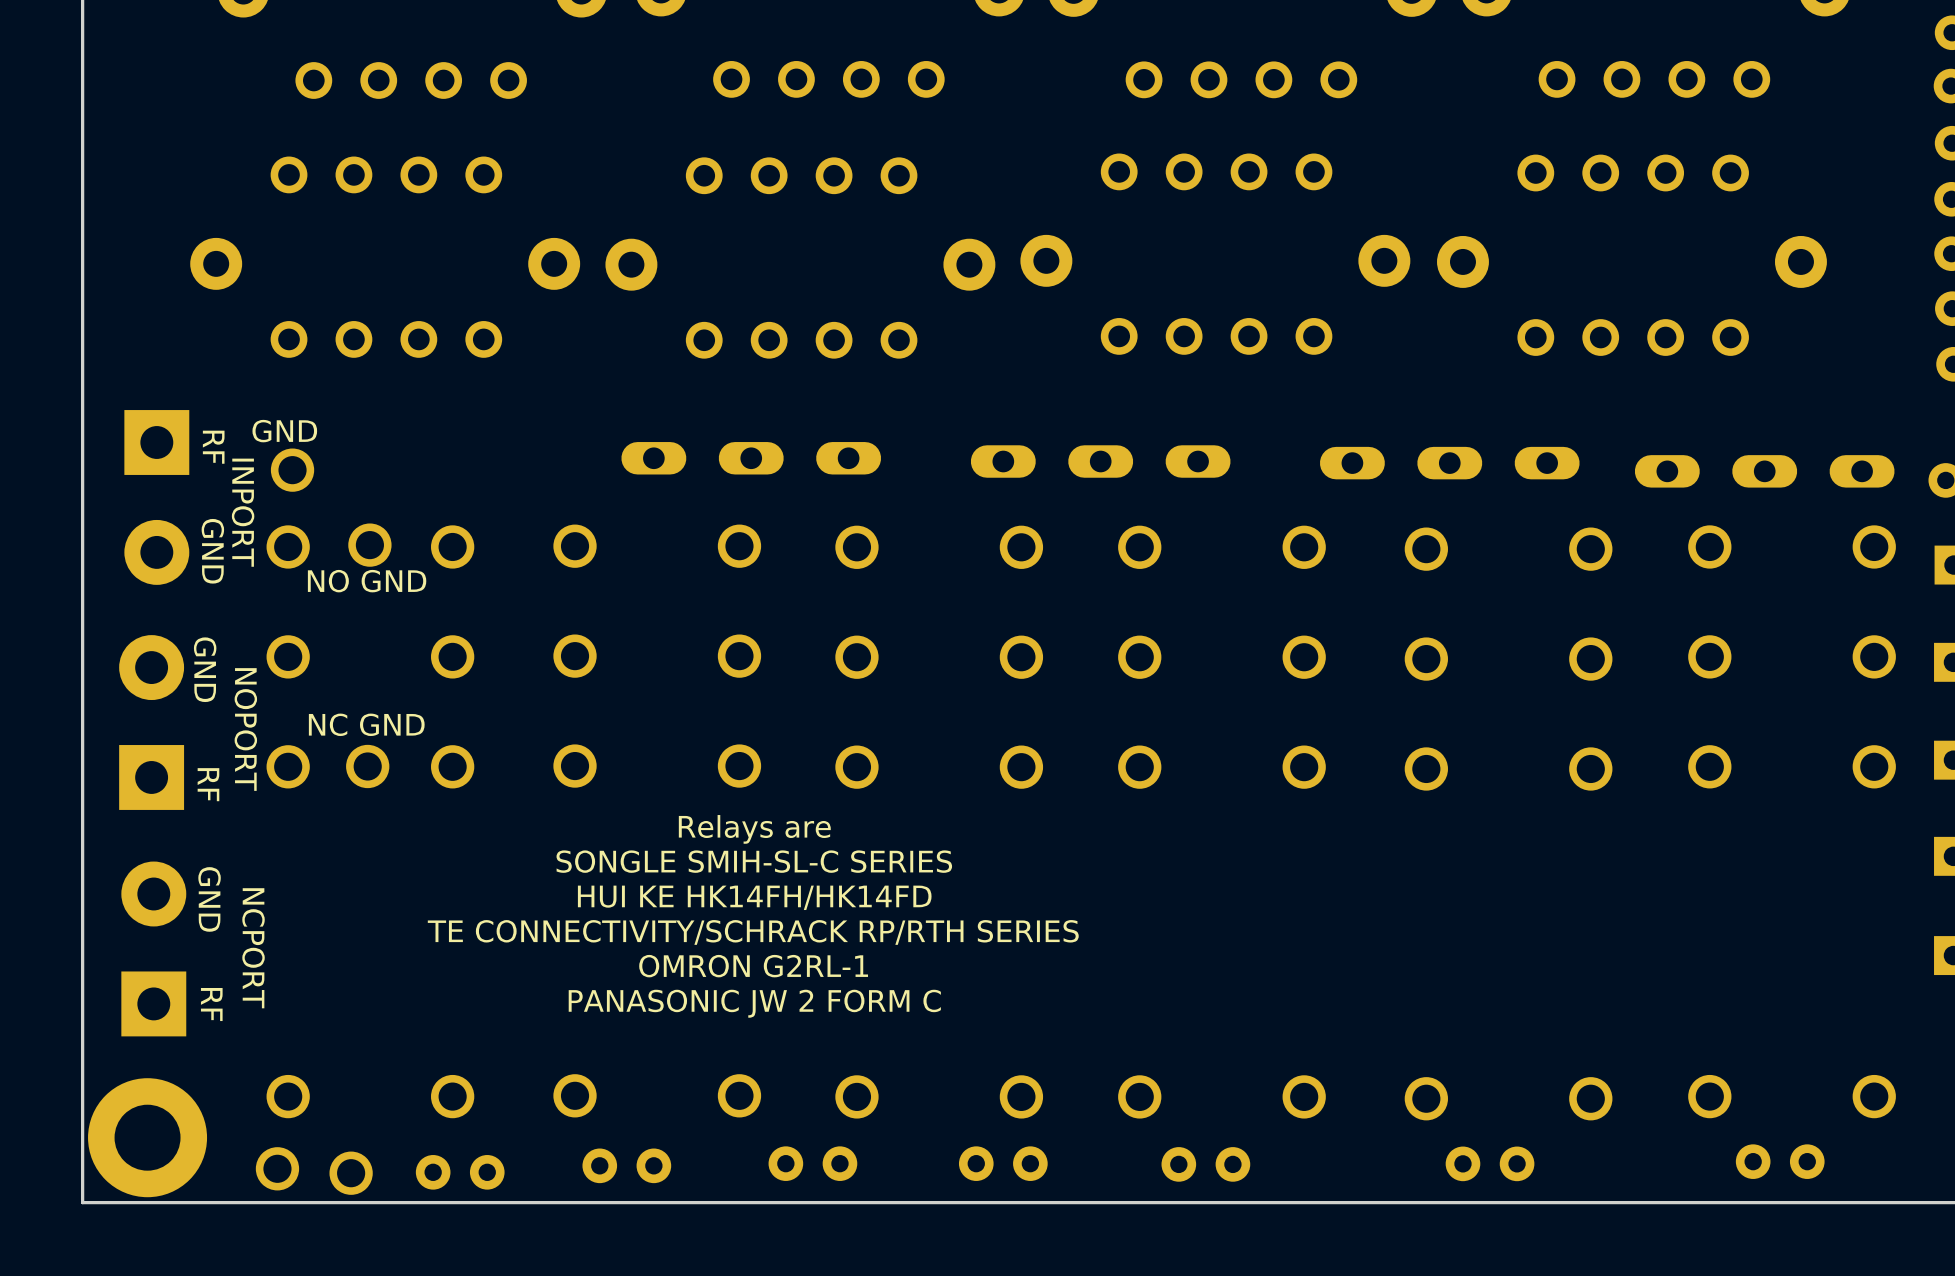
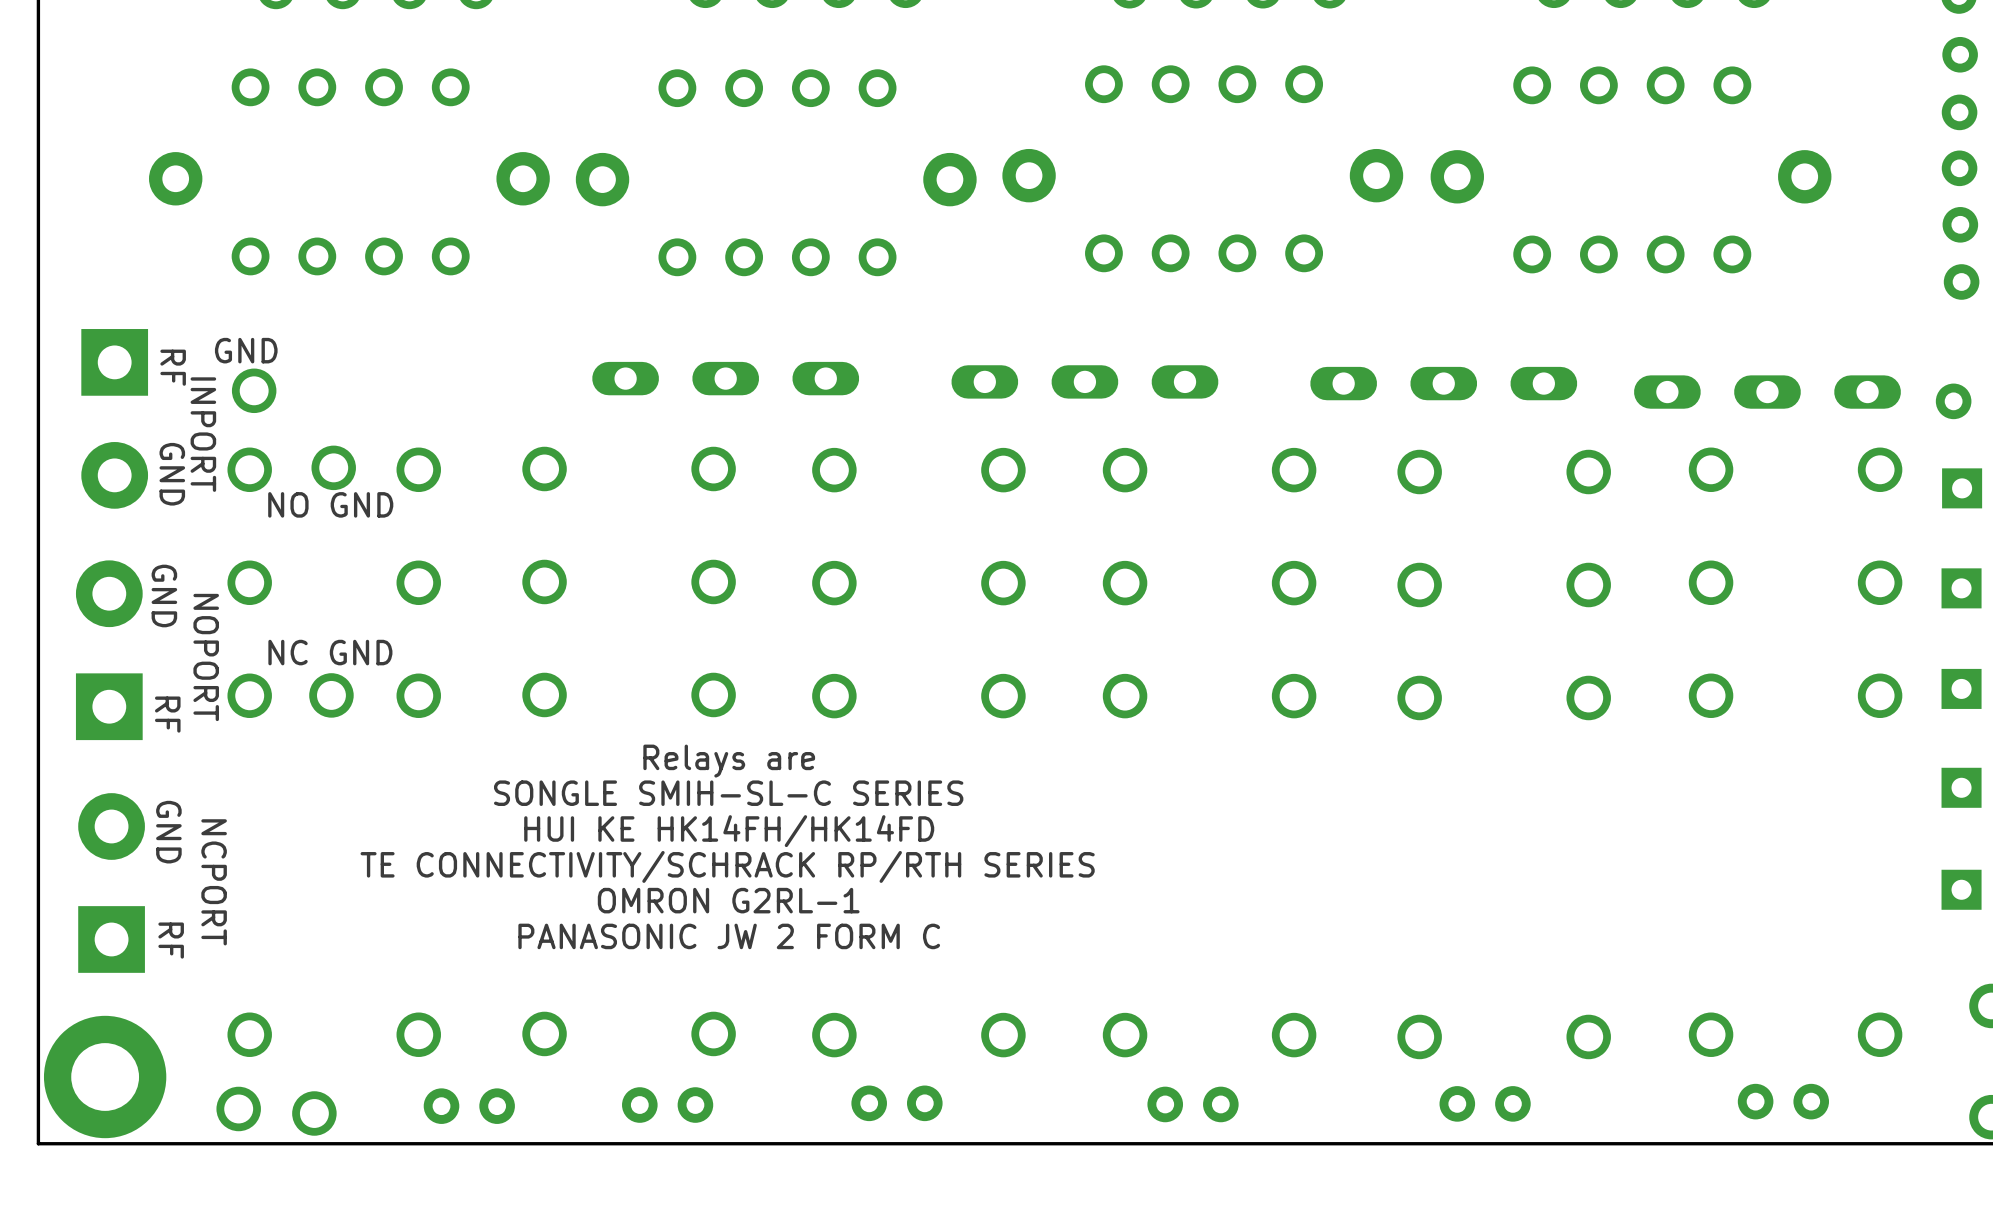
part: (812, 1163) -> none
part: none -> (896, 1103)
part: (1003, 1163) -> none
part: none -> (667, 1105)
part: (626, 1165) -> none
part position: (460, 1172) -> (469, 1106)

